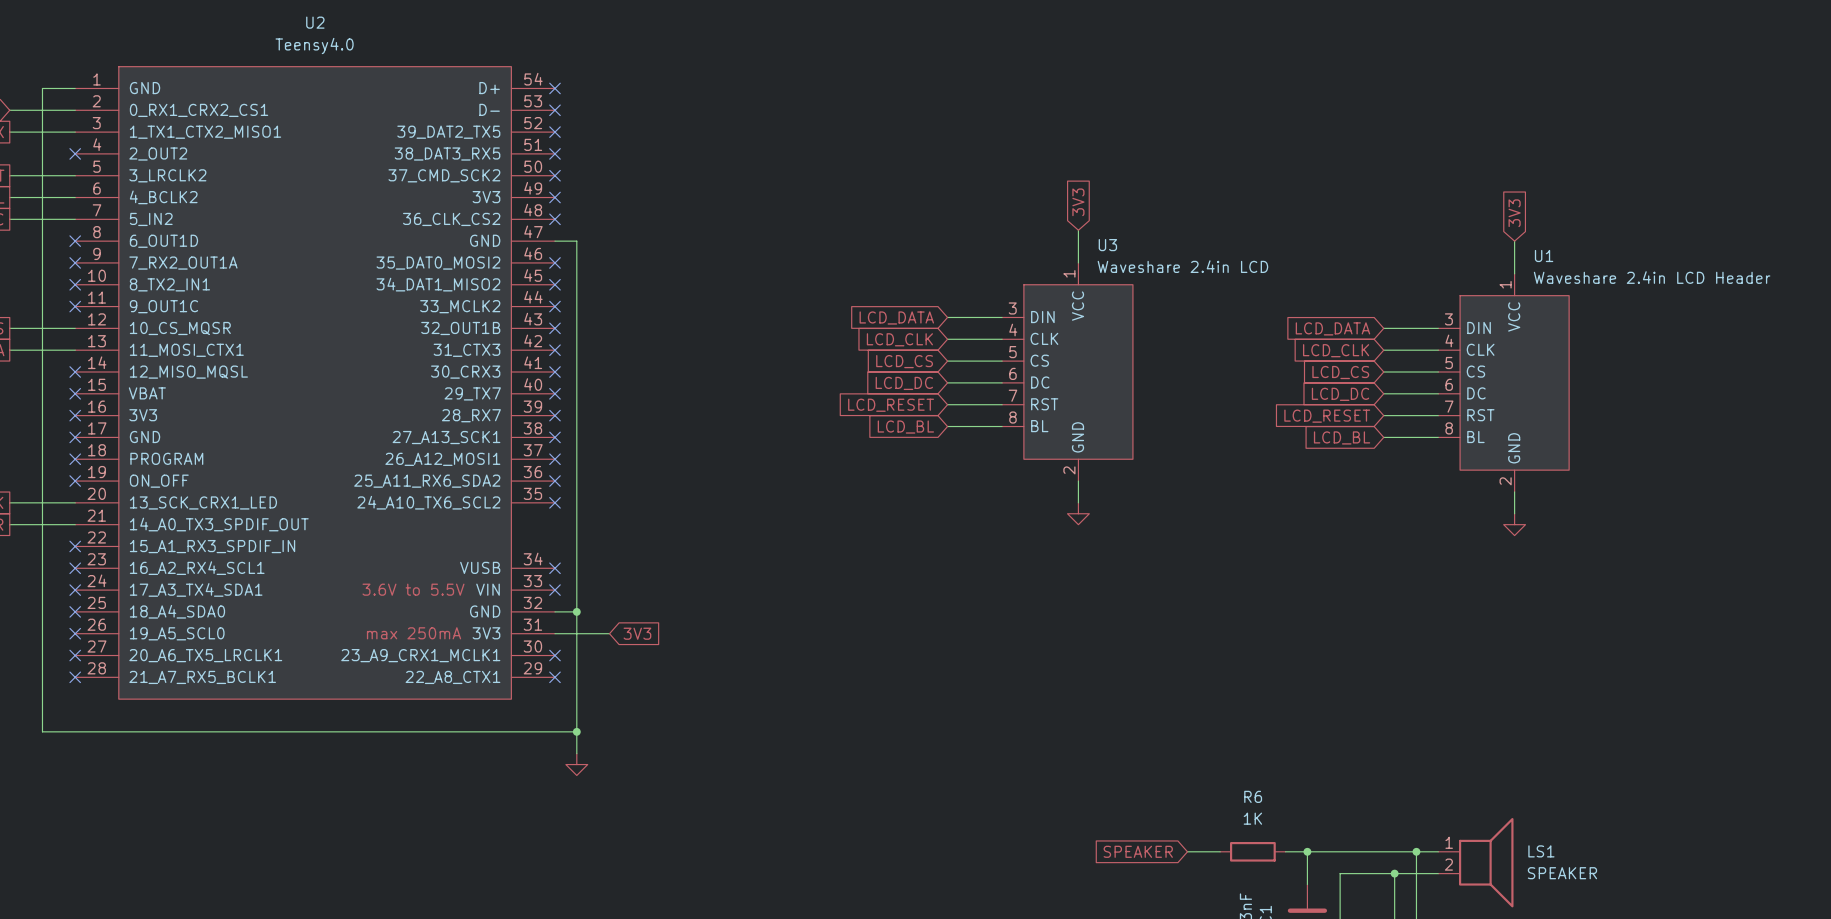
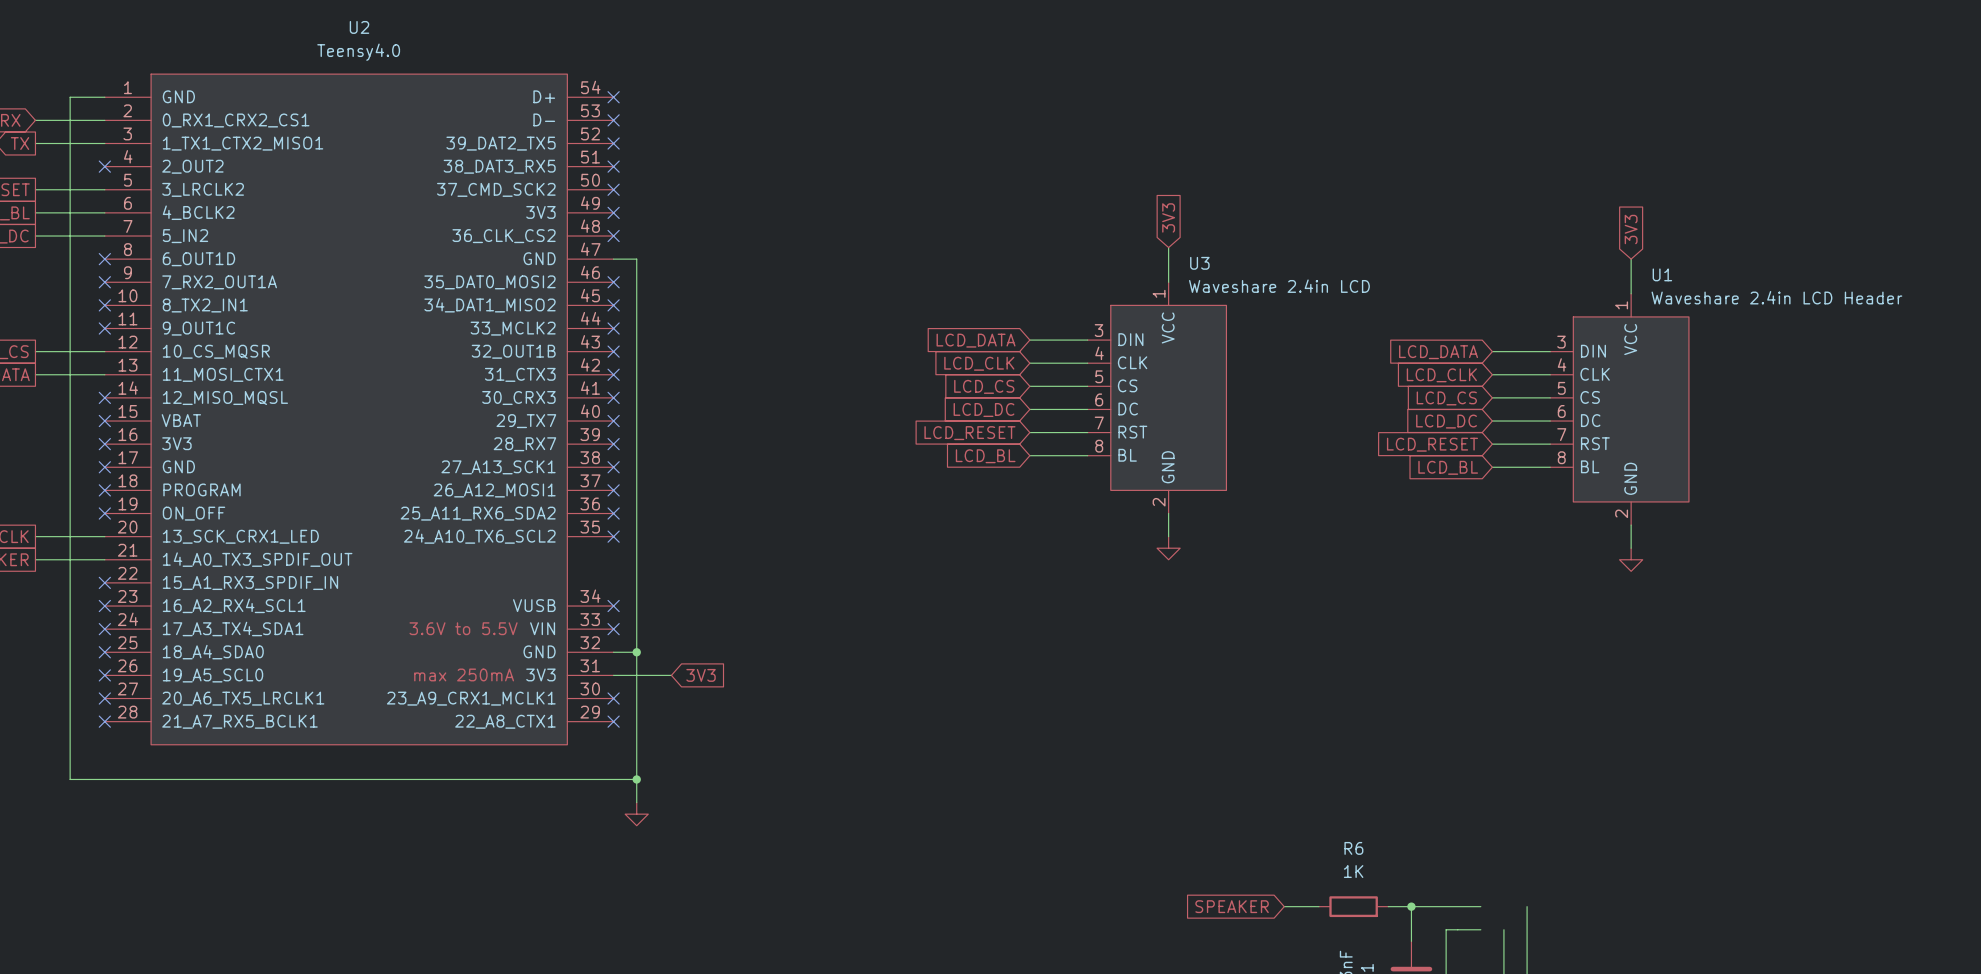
wire: (1372, 851) (1438, 851) -> none
junction: (1416, 851) -> none
LS1: SPEAKER (1475, 862) -> none
wire: (1372, 873) (1438, 873) -> none
junction: (1394, 873) -> none

